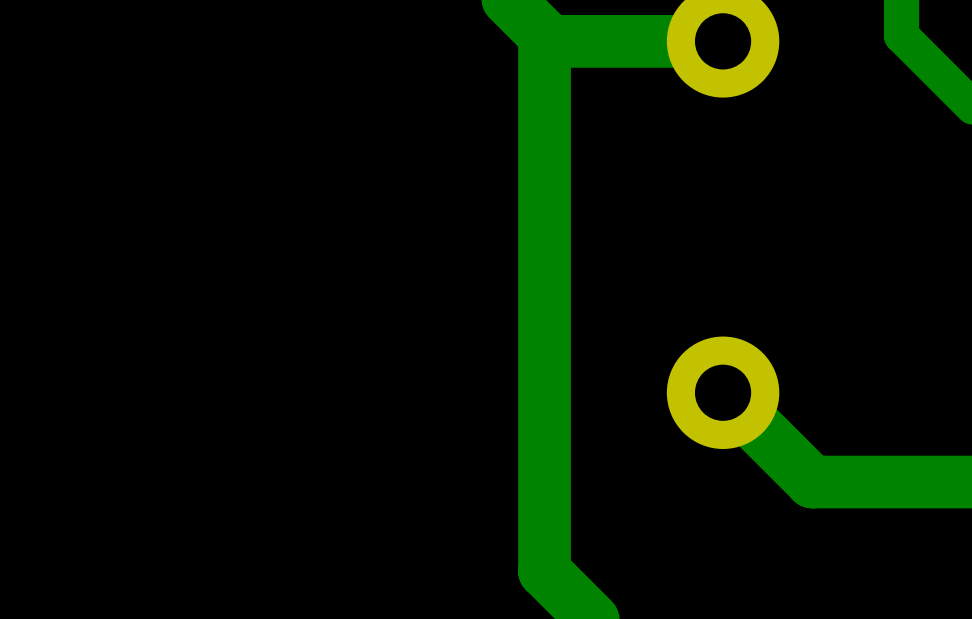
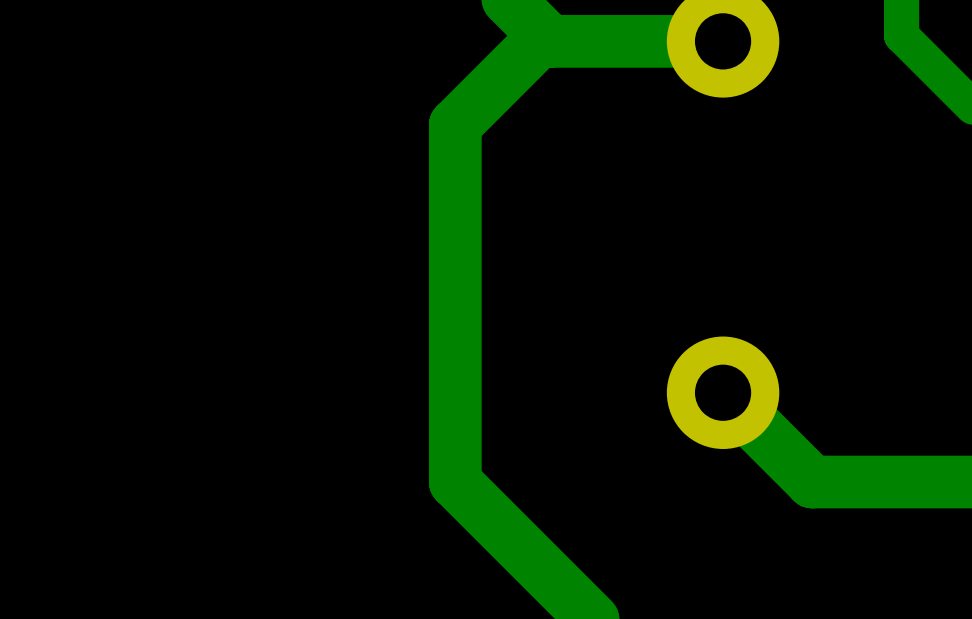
track: (544, 35) (544, 571) -> (544, 35) (455, 124) (455, 482) (544, 571)

